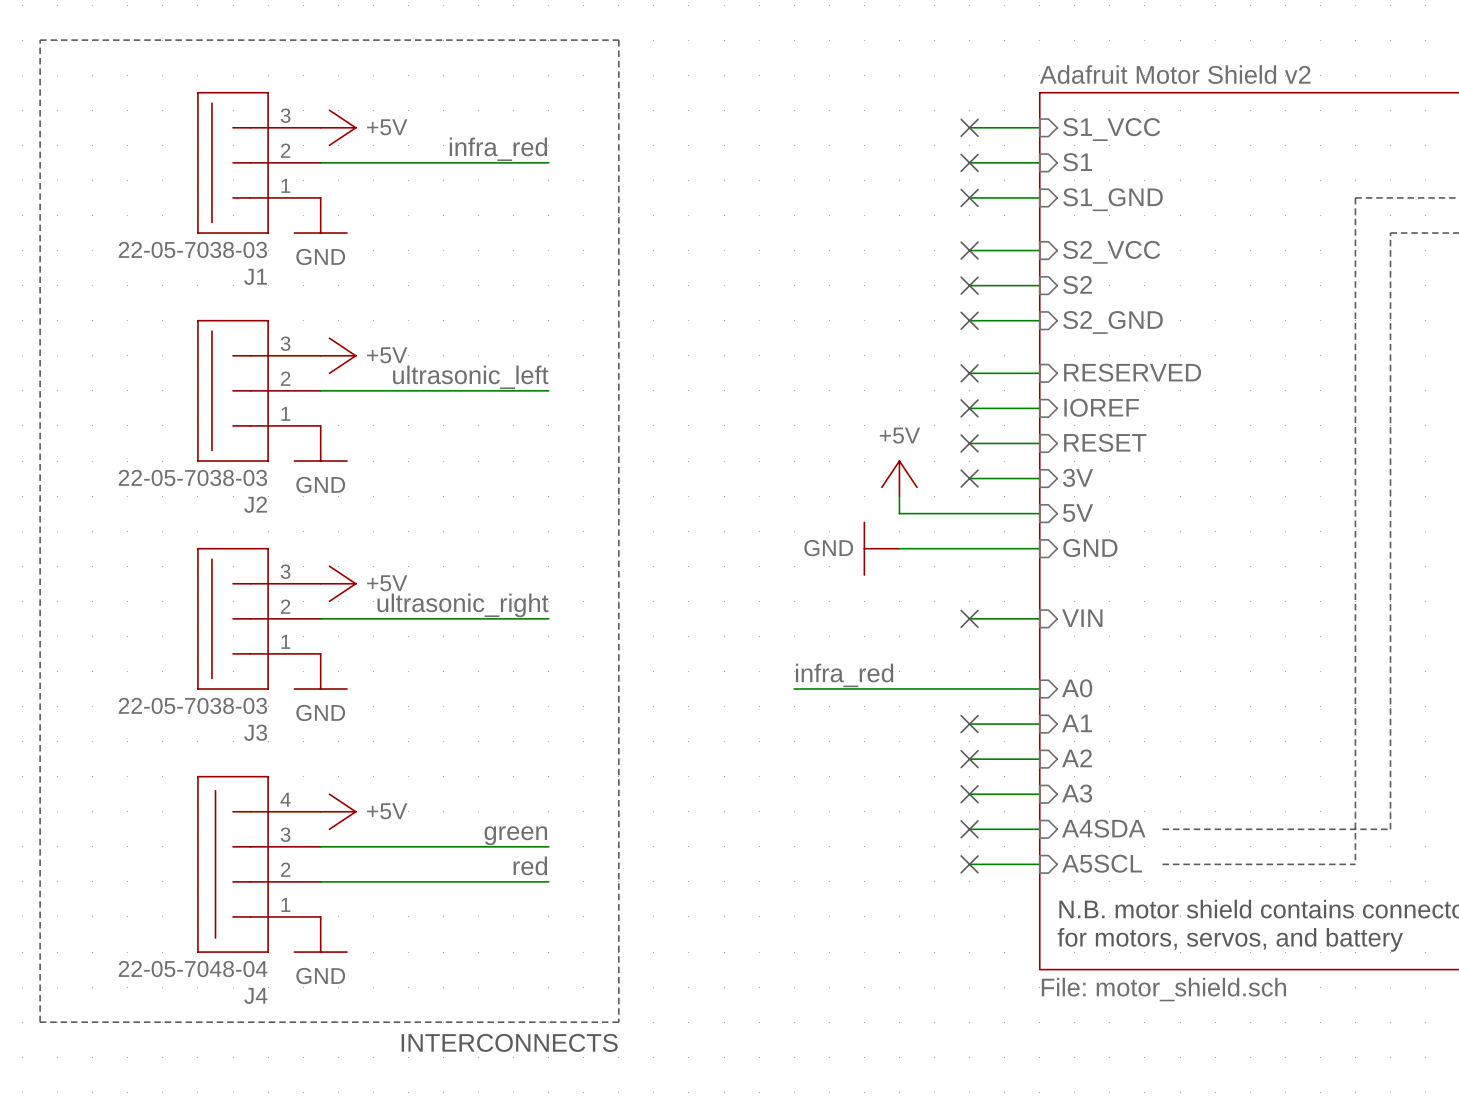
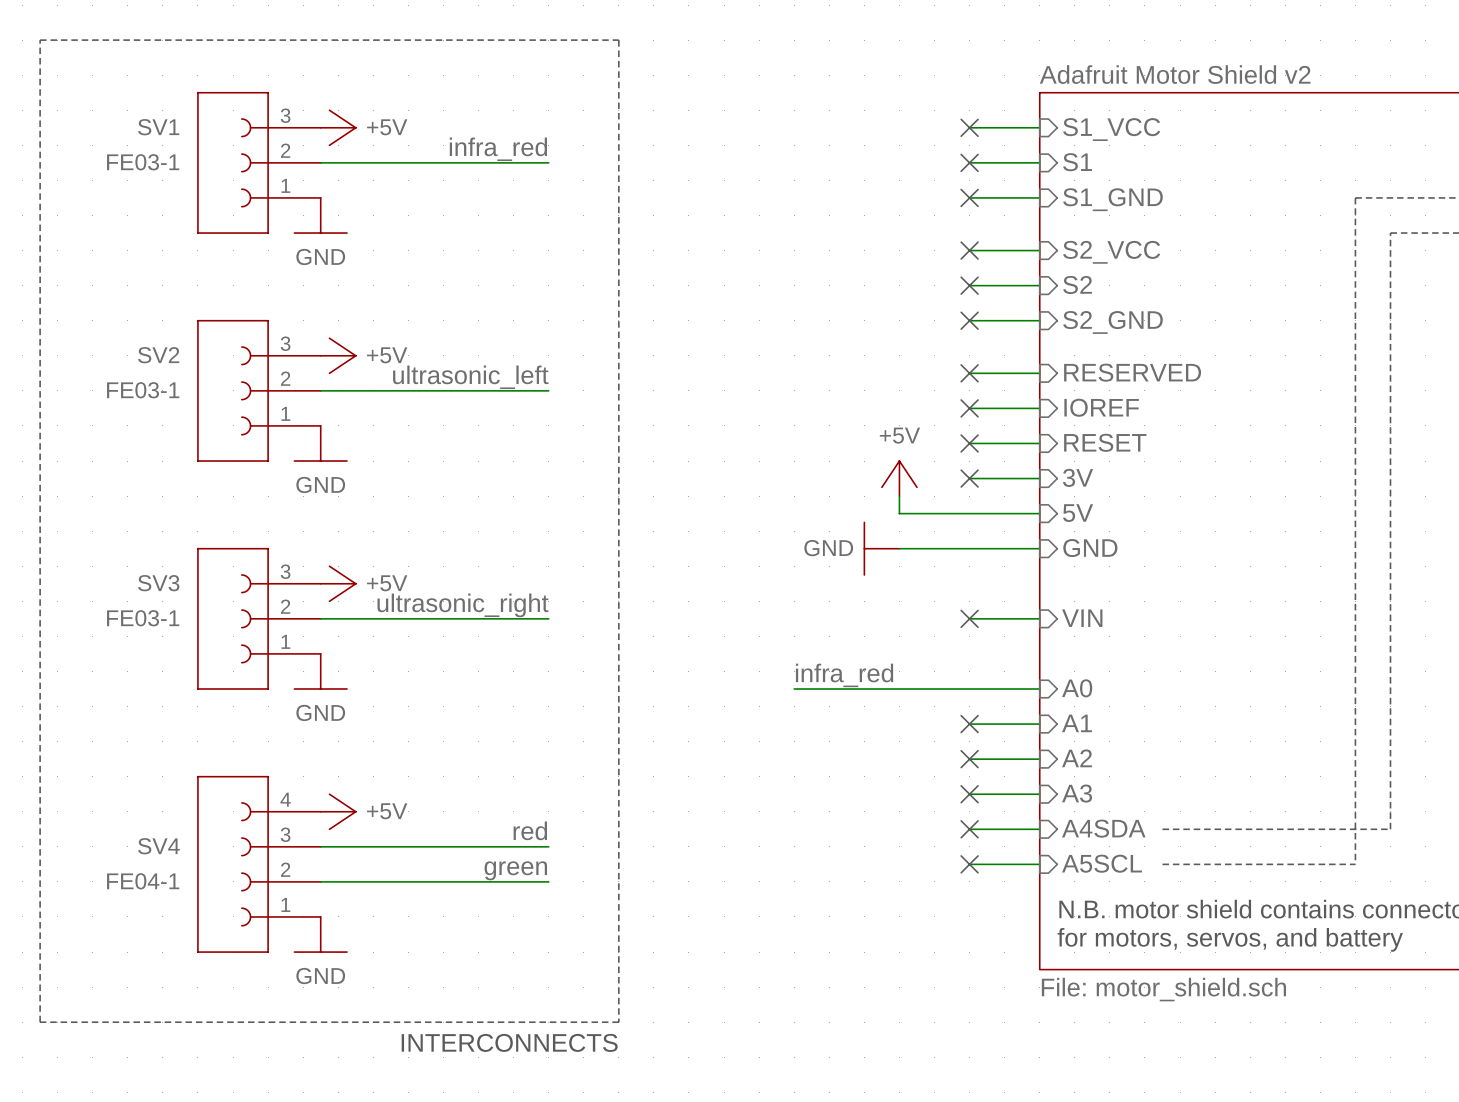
J1: 22-05-7038-03 (259, 162) -> none
SV1: none -> FE03-1 (259, 162)
J2: 22-05-7038-03 (259, 390) -> none
SV2: none -> FE03-1 (259, 390)
J3: 22-05-7038-03 (259, 618) -> none
SV3: none -> FE03-1 (259, 618)
label: green (515, 835) -> red (530, 830)
J4: 22-05-7048-04 (259, 864) -> none
SV4: none -> FE04-1 (259, 864)
label: red (530, 865) -> green (515, 870)

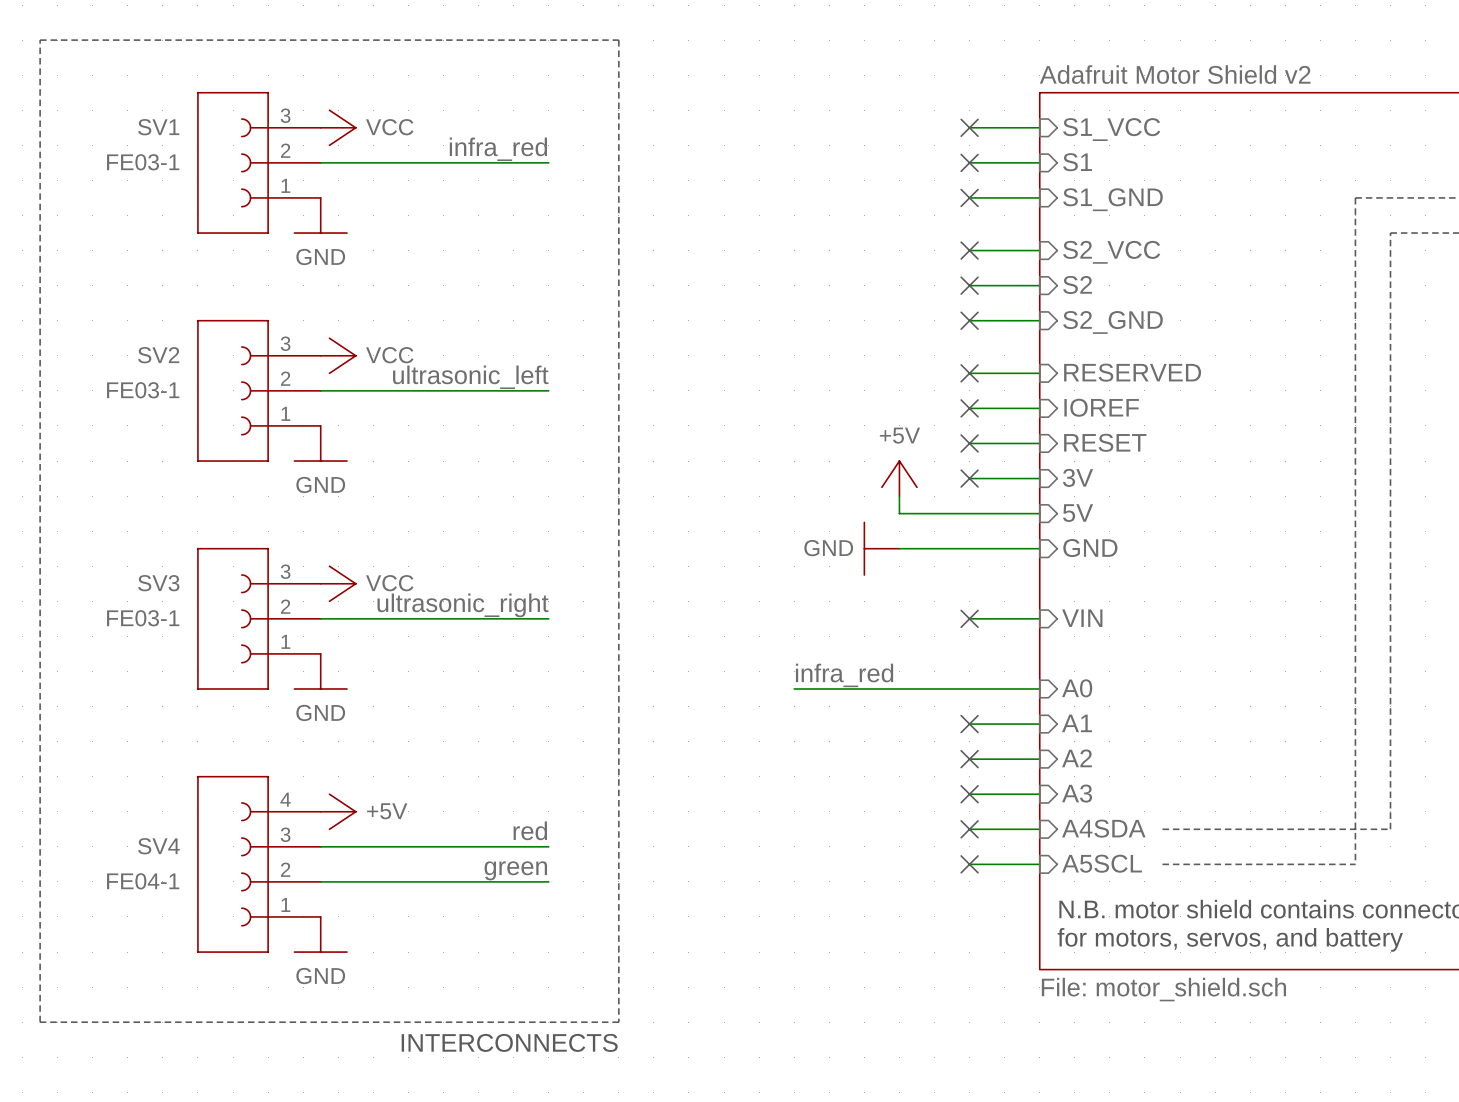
power symbol: +5V (338, 127) -> VCC (338, 127)
power symbol: +5V (338, 355) -> VCC (338, 355)
power symbol: +5V (338, 583) -> VCC (338, 583)

